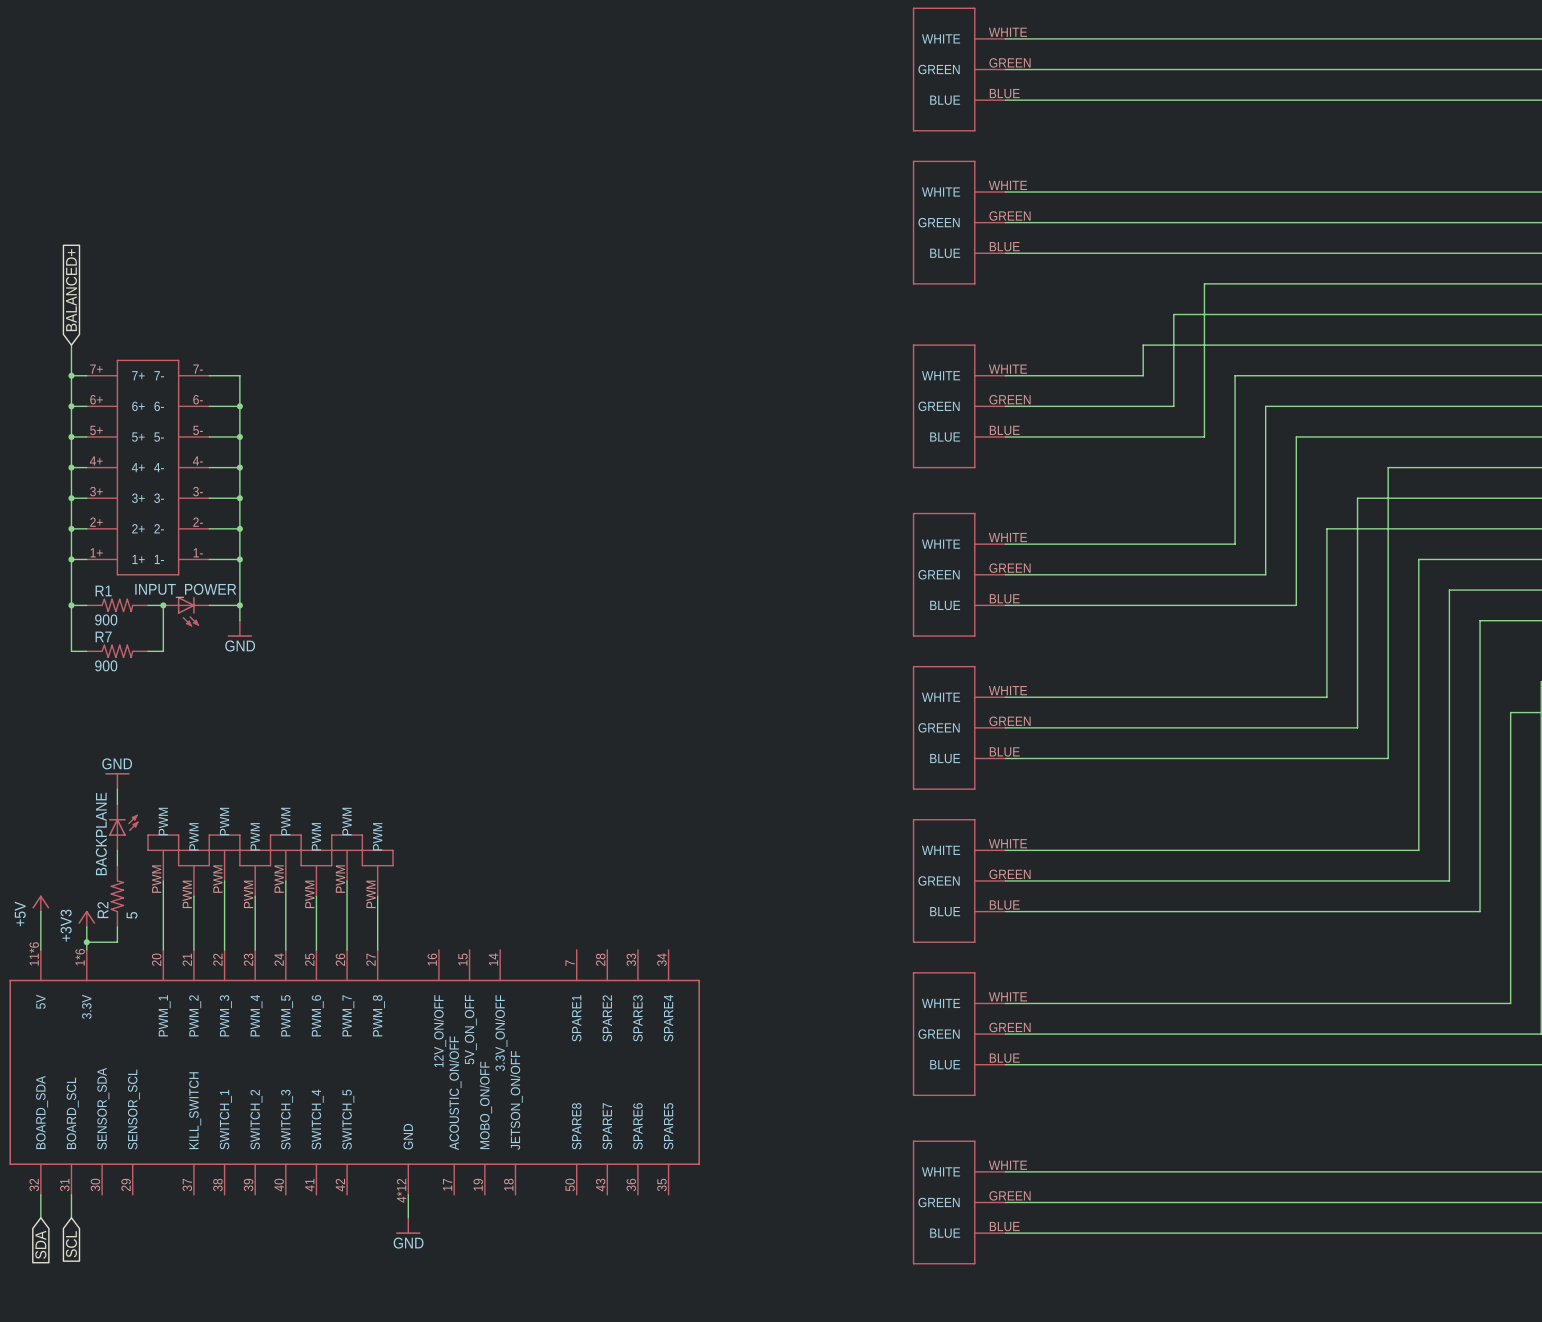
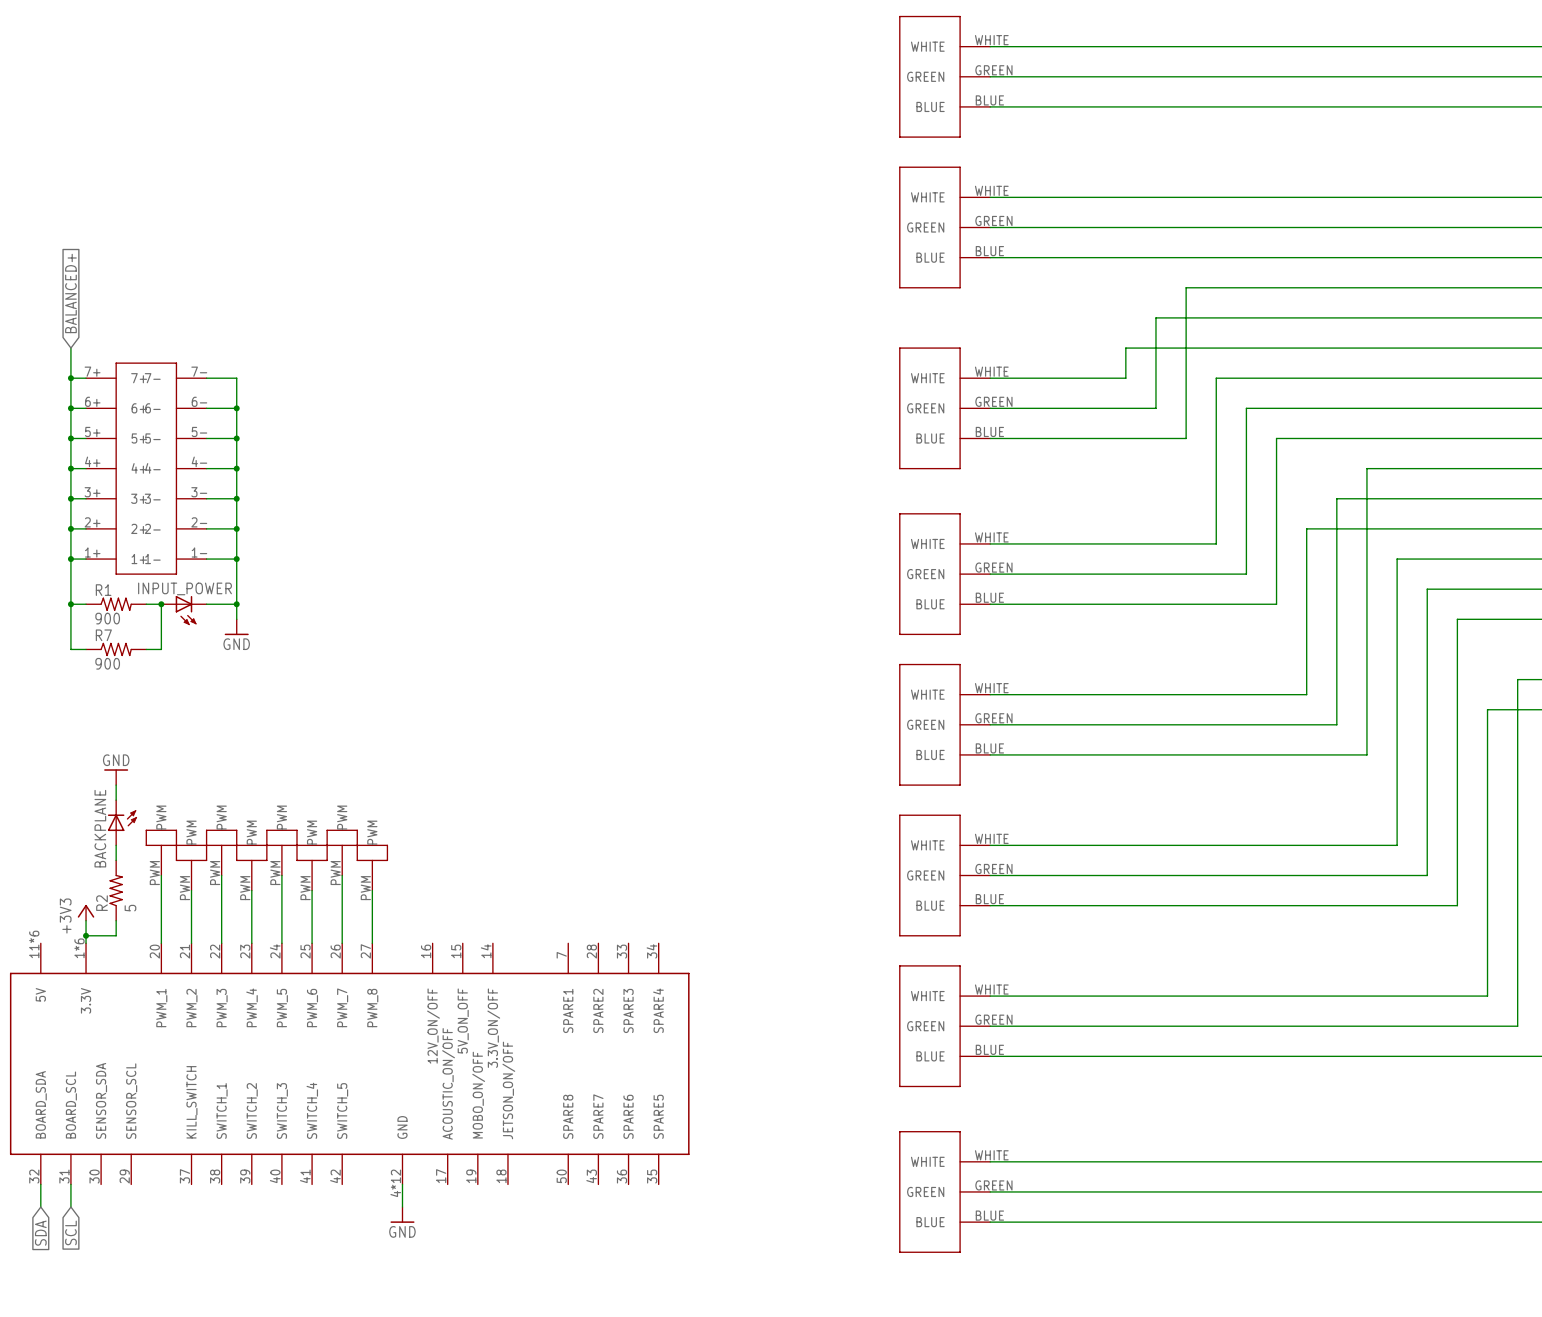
power symbol: +5V (40, 903) -> none
wire: (40, 911) (40, 949) -> none

